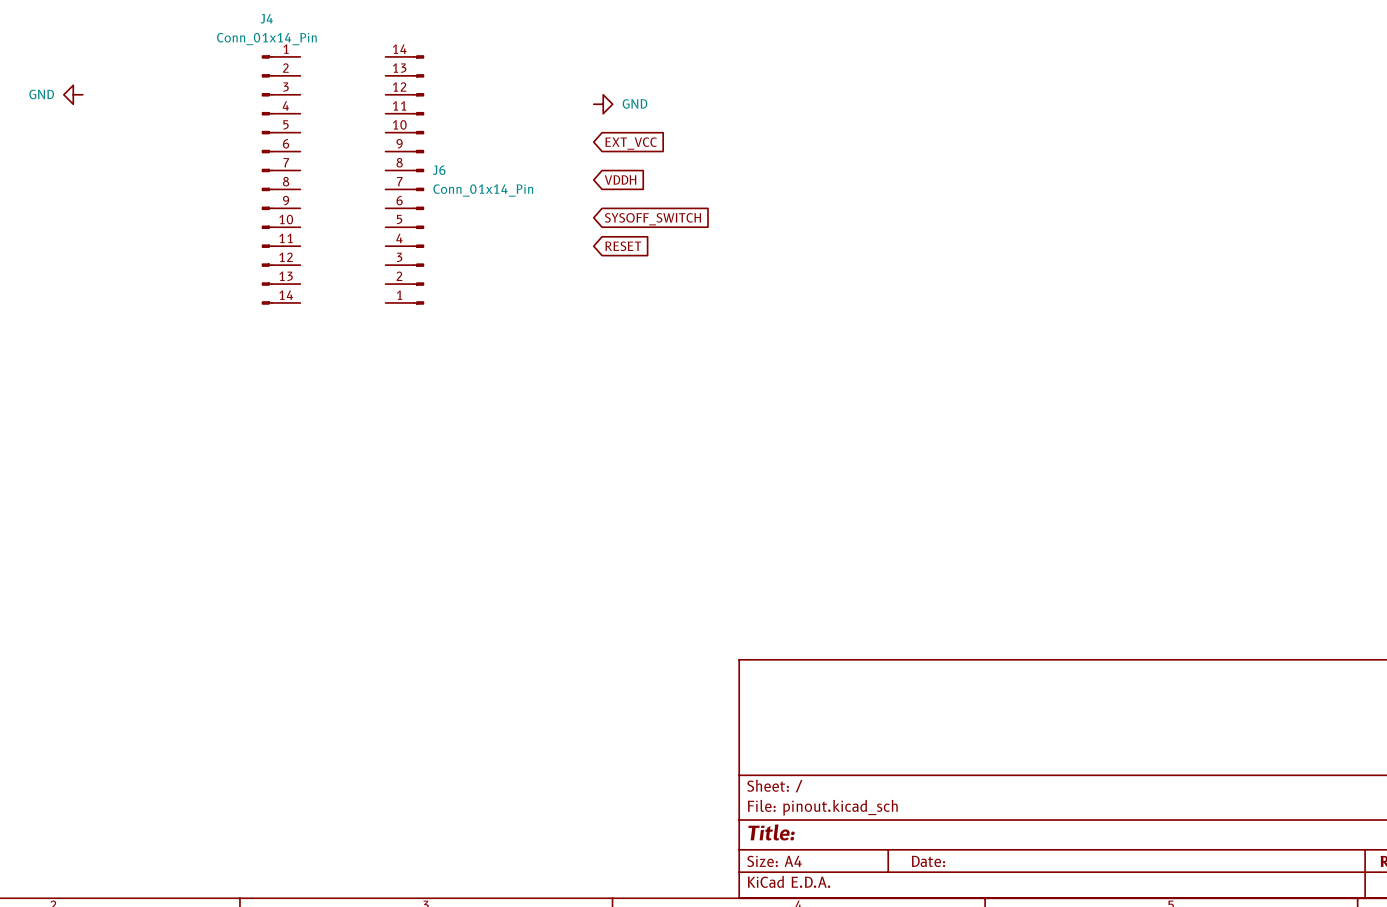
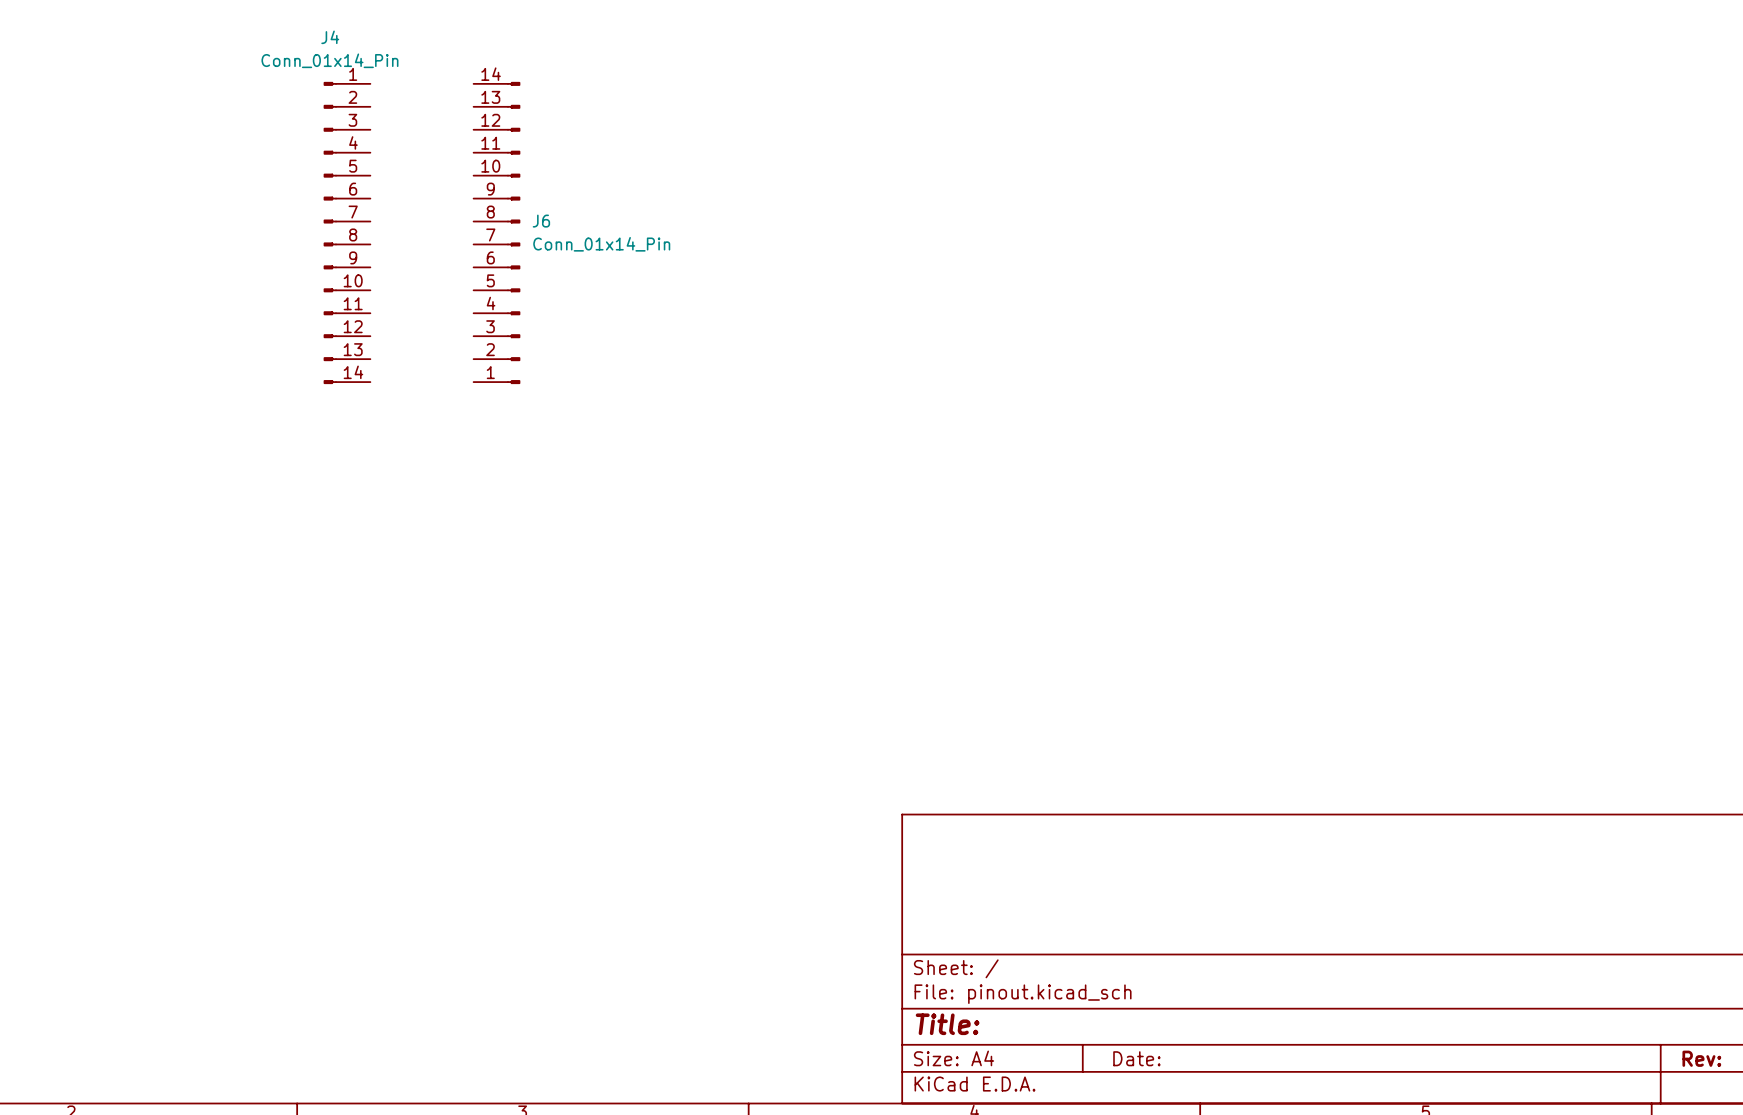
power symbol: GND (73, 94) -> none
power symbol: GND (603, 104) -> none
global label: EXT_VCC (631, 143) -> none
global label: VDDH (620, 180) -> none
global label: SYSOFF_SWITCH (652, 219) -> none
global label: RESET (623, 246) -> none

